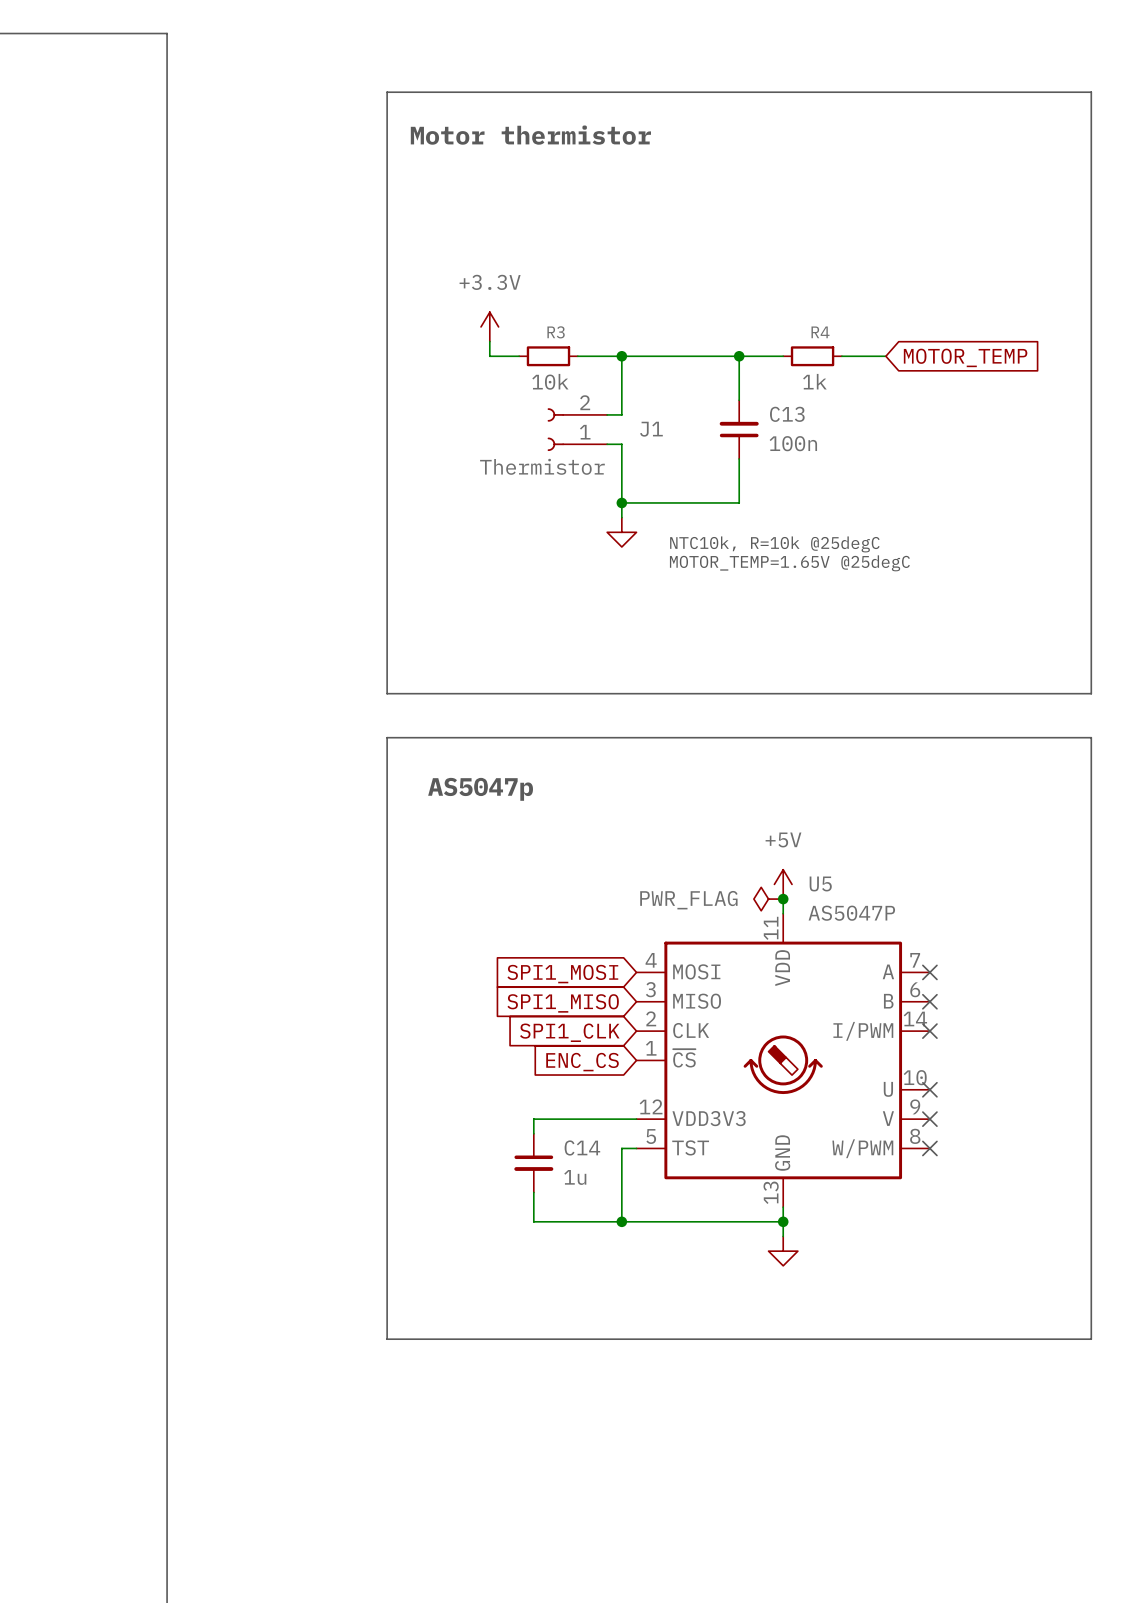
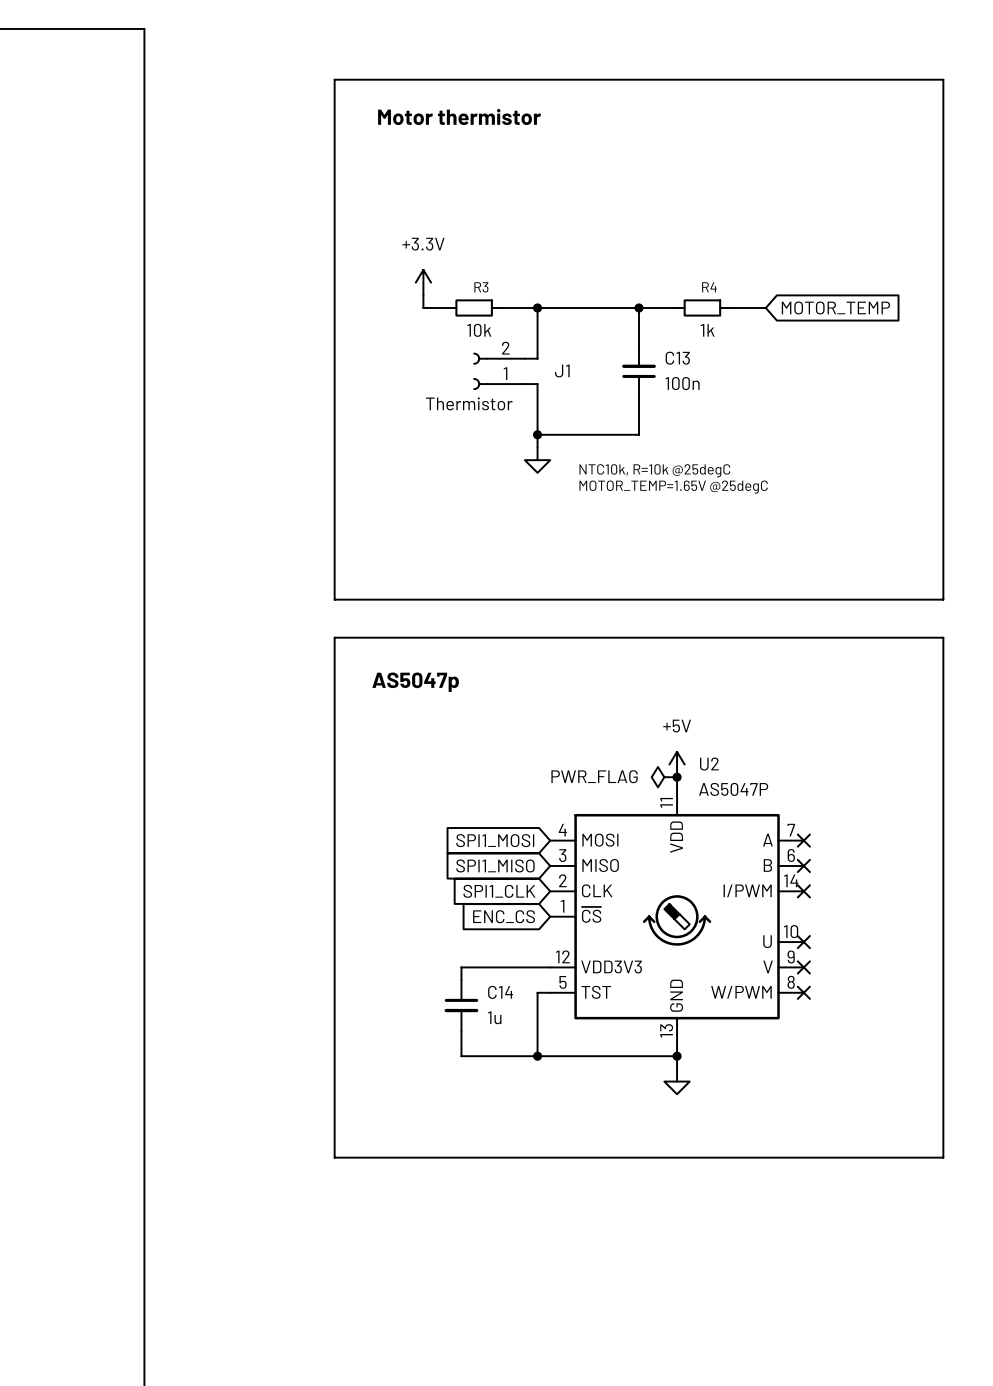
U5 name: U5 (820, 883) -> U2 (709, 764)

